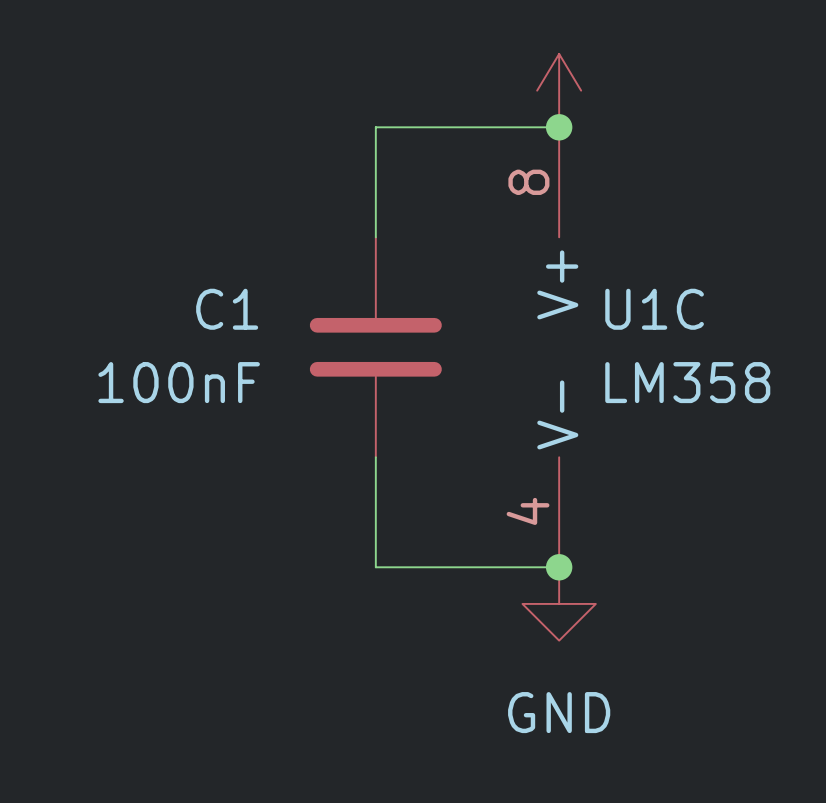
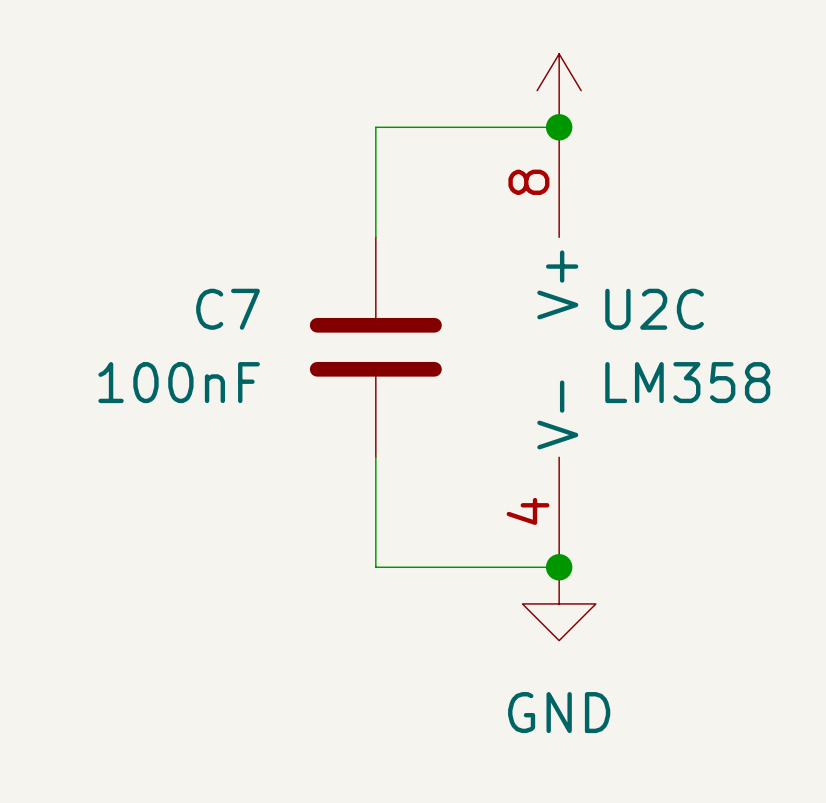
C1 name: C1 (227, 309) -> C7 (228, 309)
U1C name: U1C (654, 309) -> U2C (654, 309)

